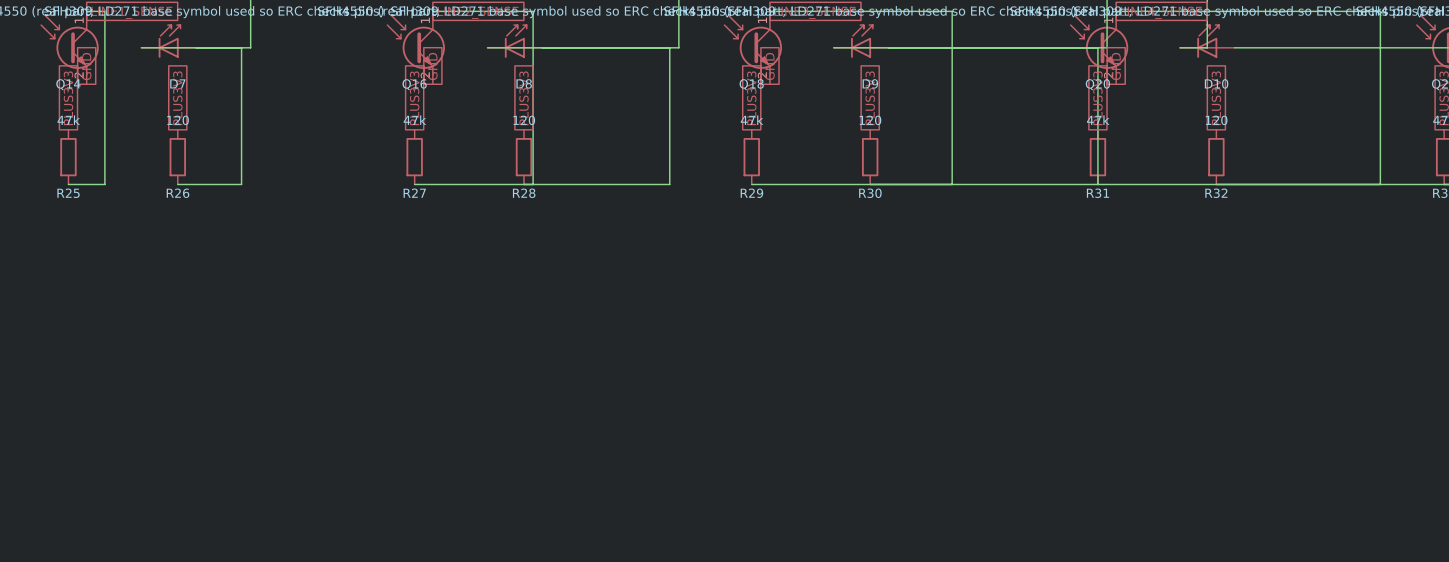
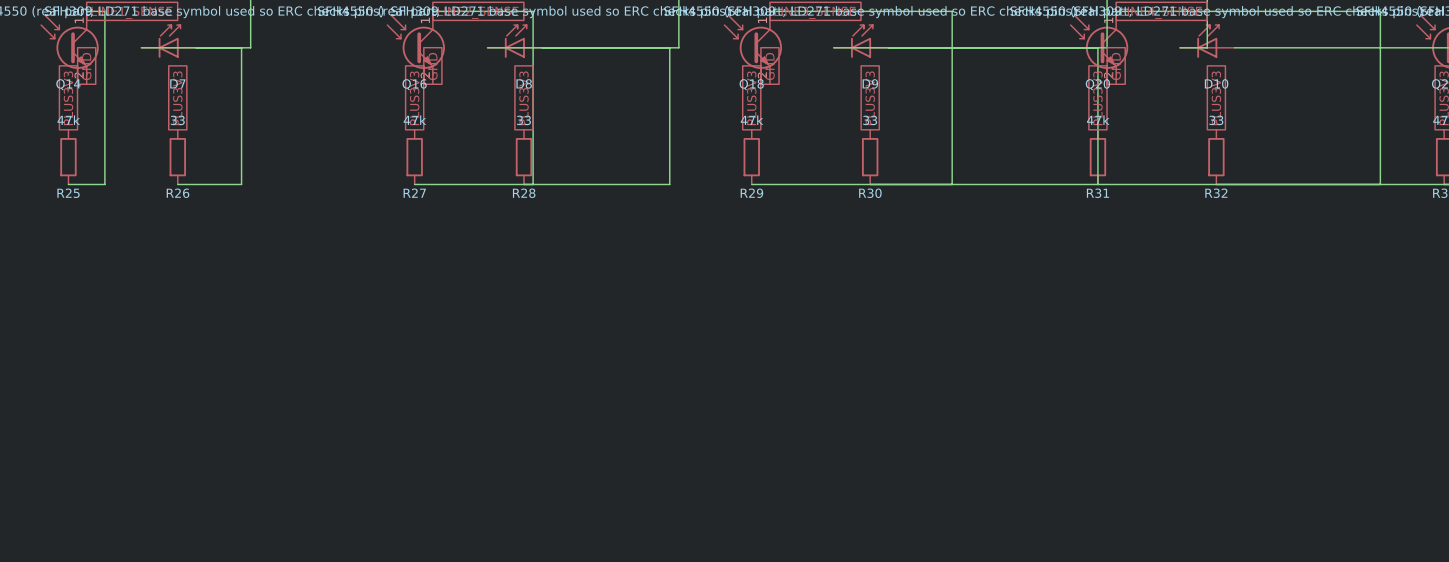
R26 value: 120 (178, 120) -> 33 (177, 120)
R28 value: 120 (524, 120) -> 33 (523, 120)
R30 value: 120 (870, 120) -> 33 (870, 120)
R32 value: 120 (1216, 120) -> 33 (1216, 120)

